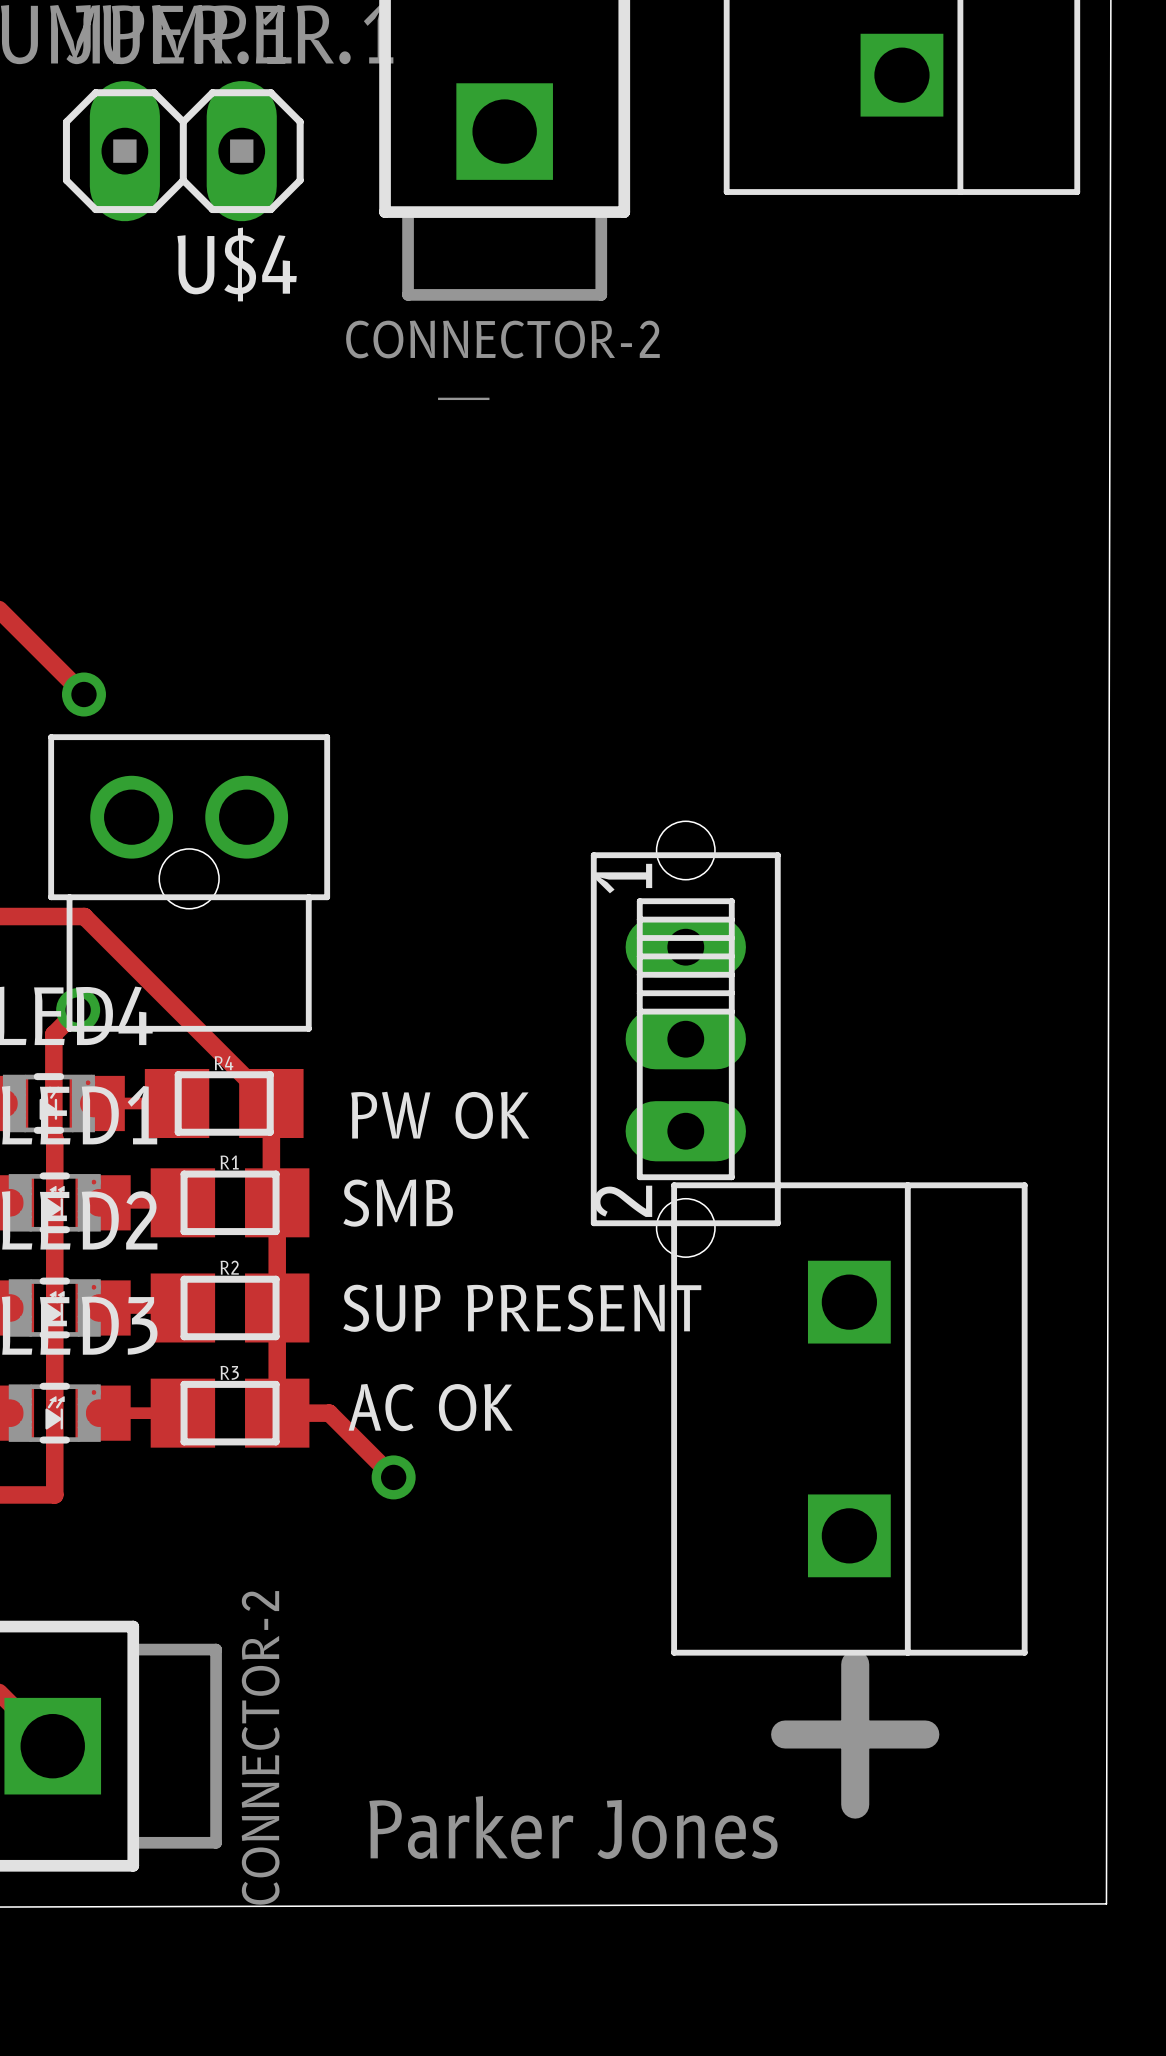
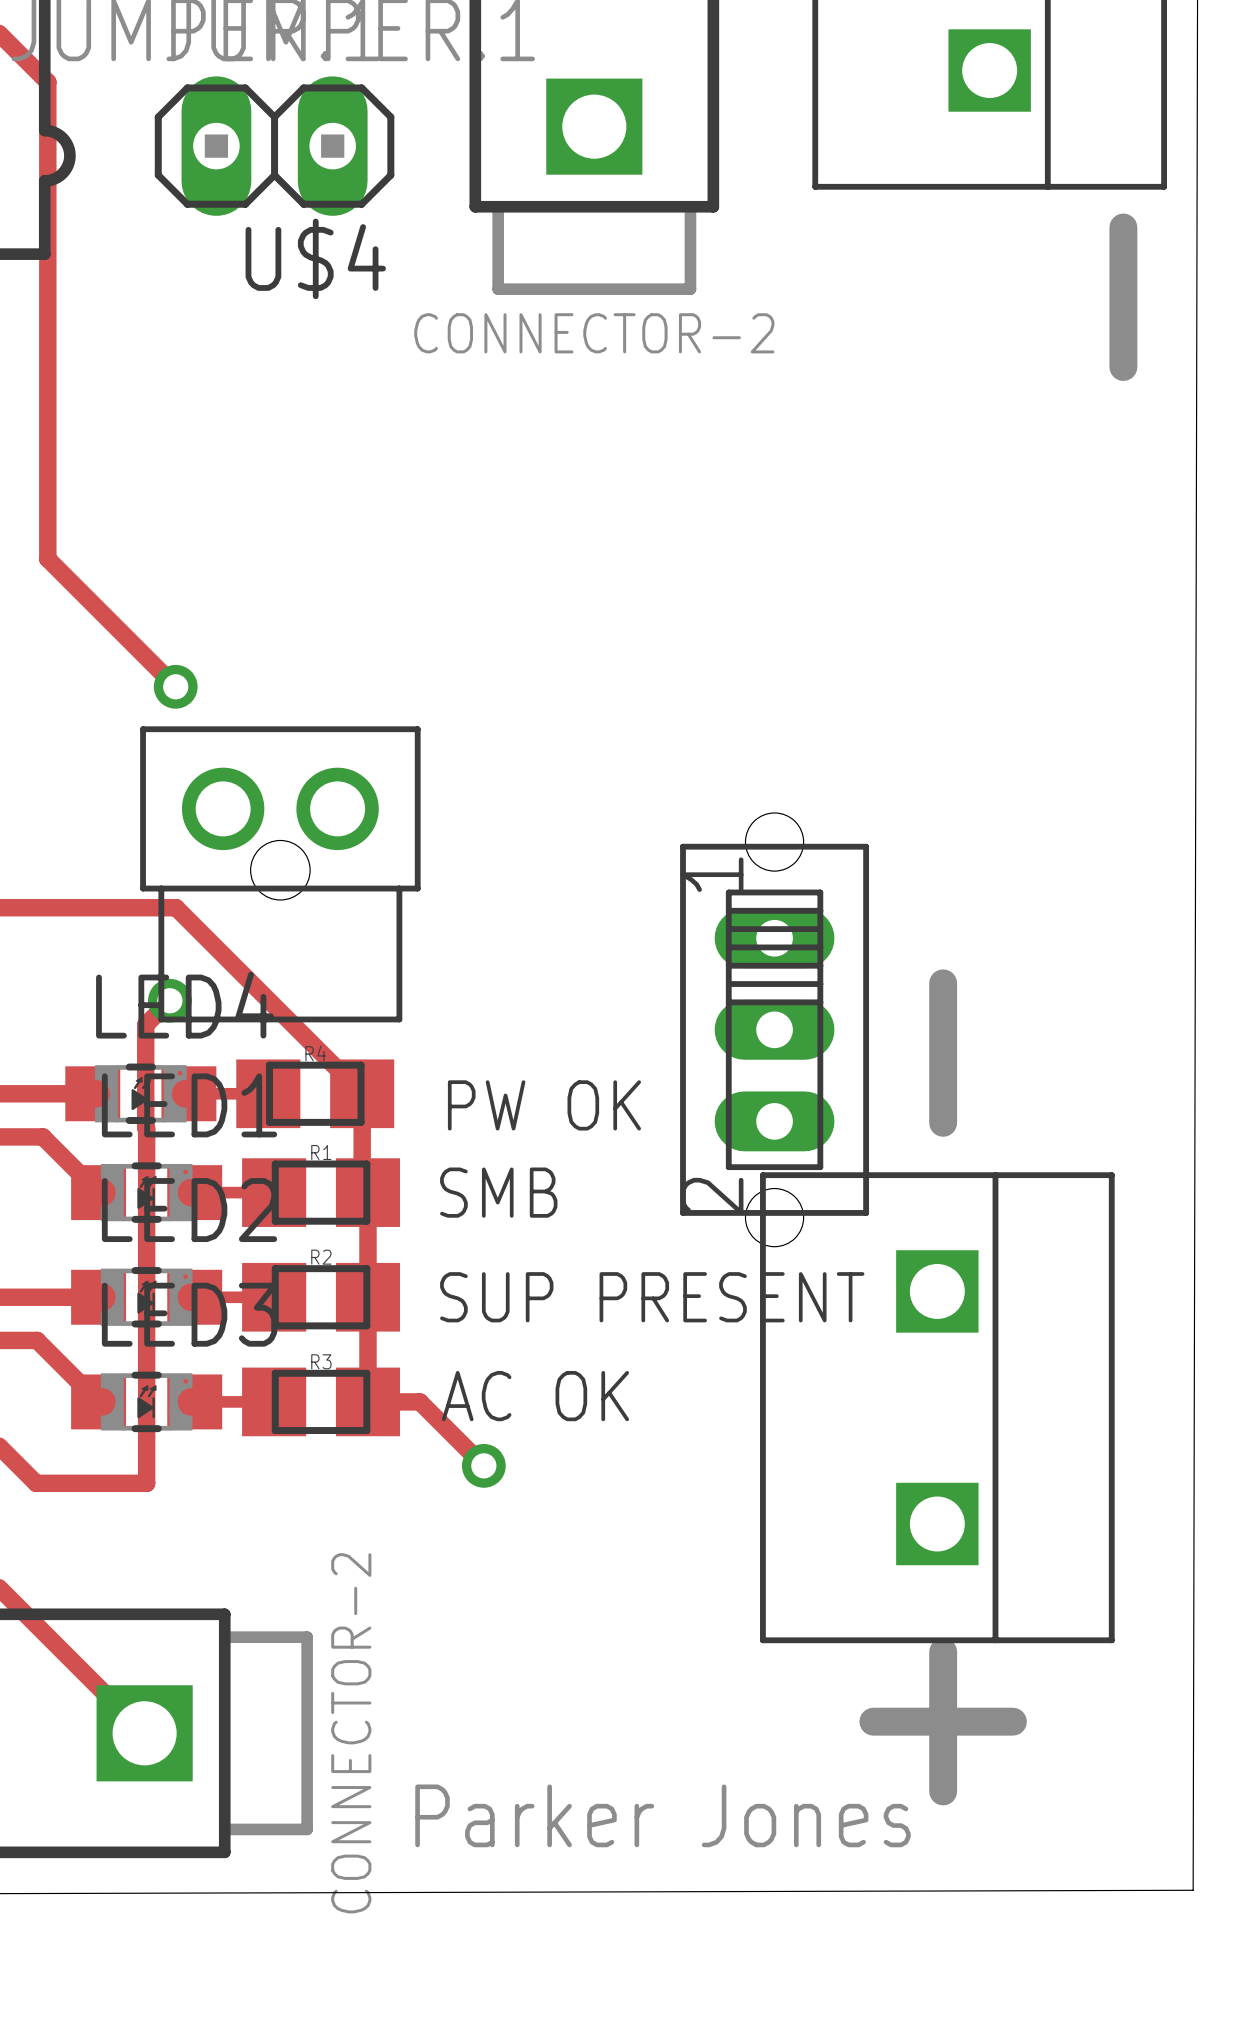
line: none -> (1123, 227) (1123, 367)
drawing: [438, 397, 490, 401] -> none
line: none -> (943, 983) (943, 1122)

